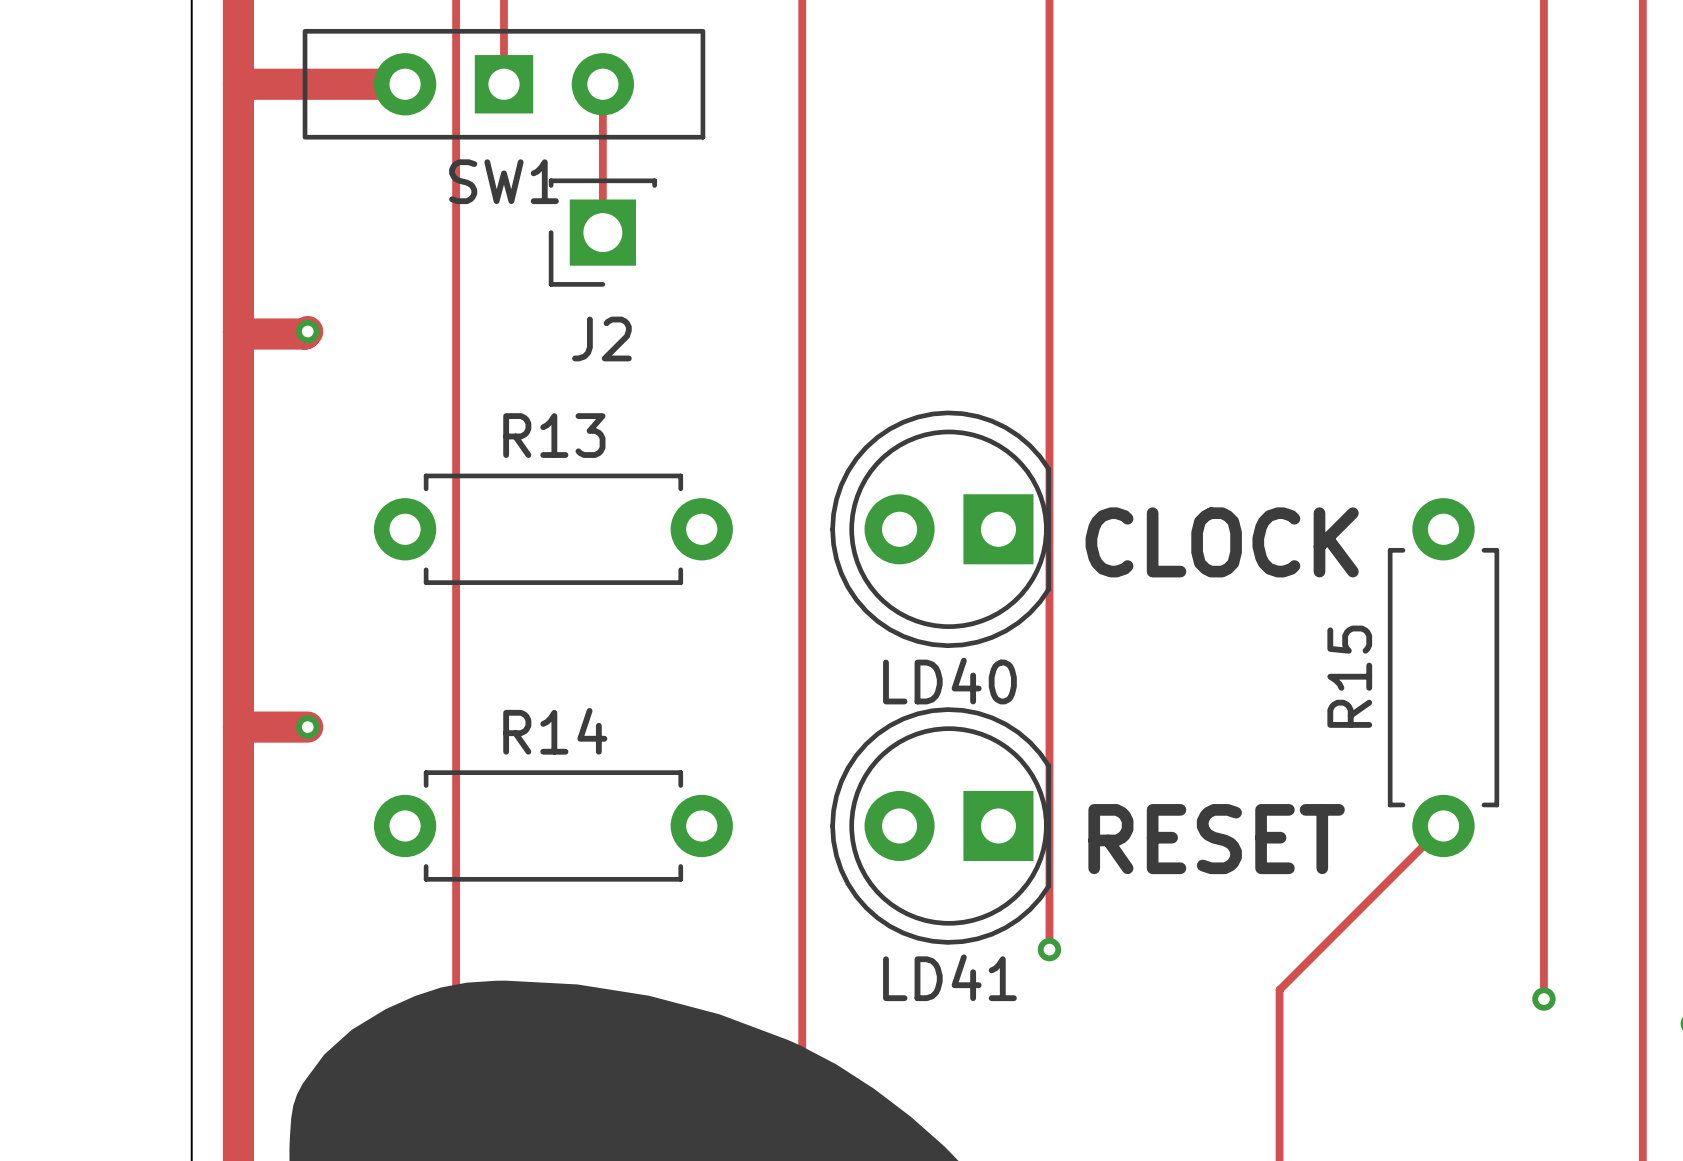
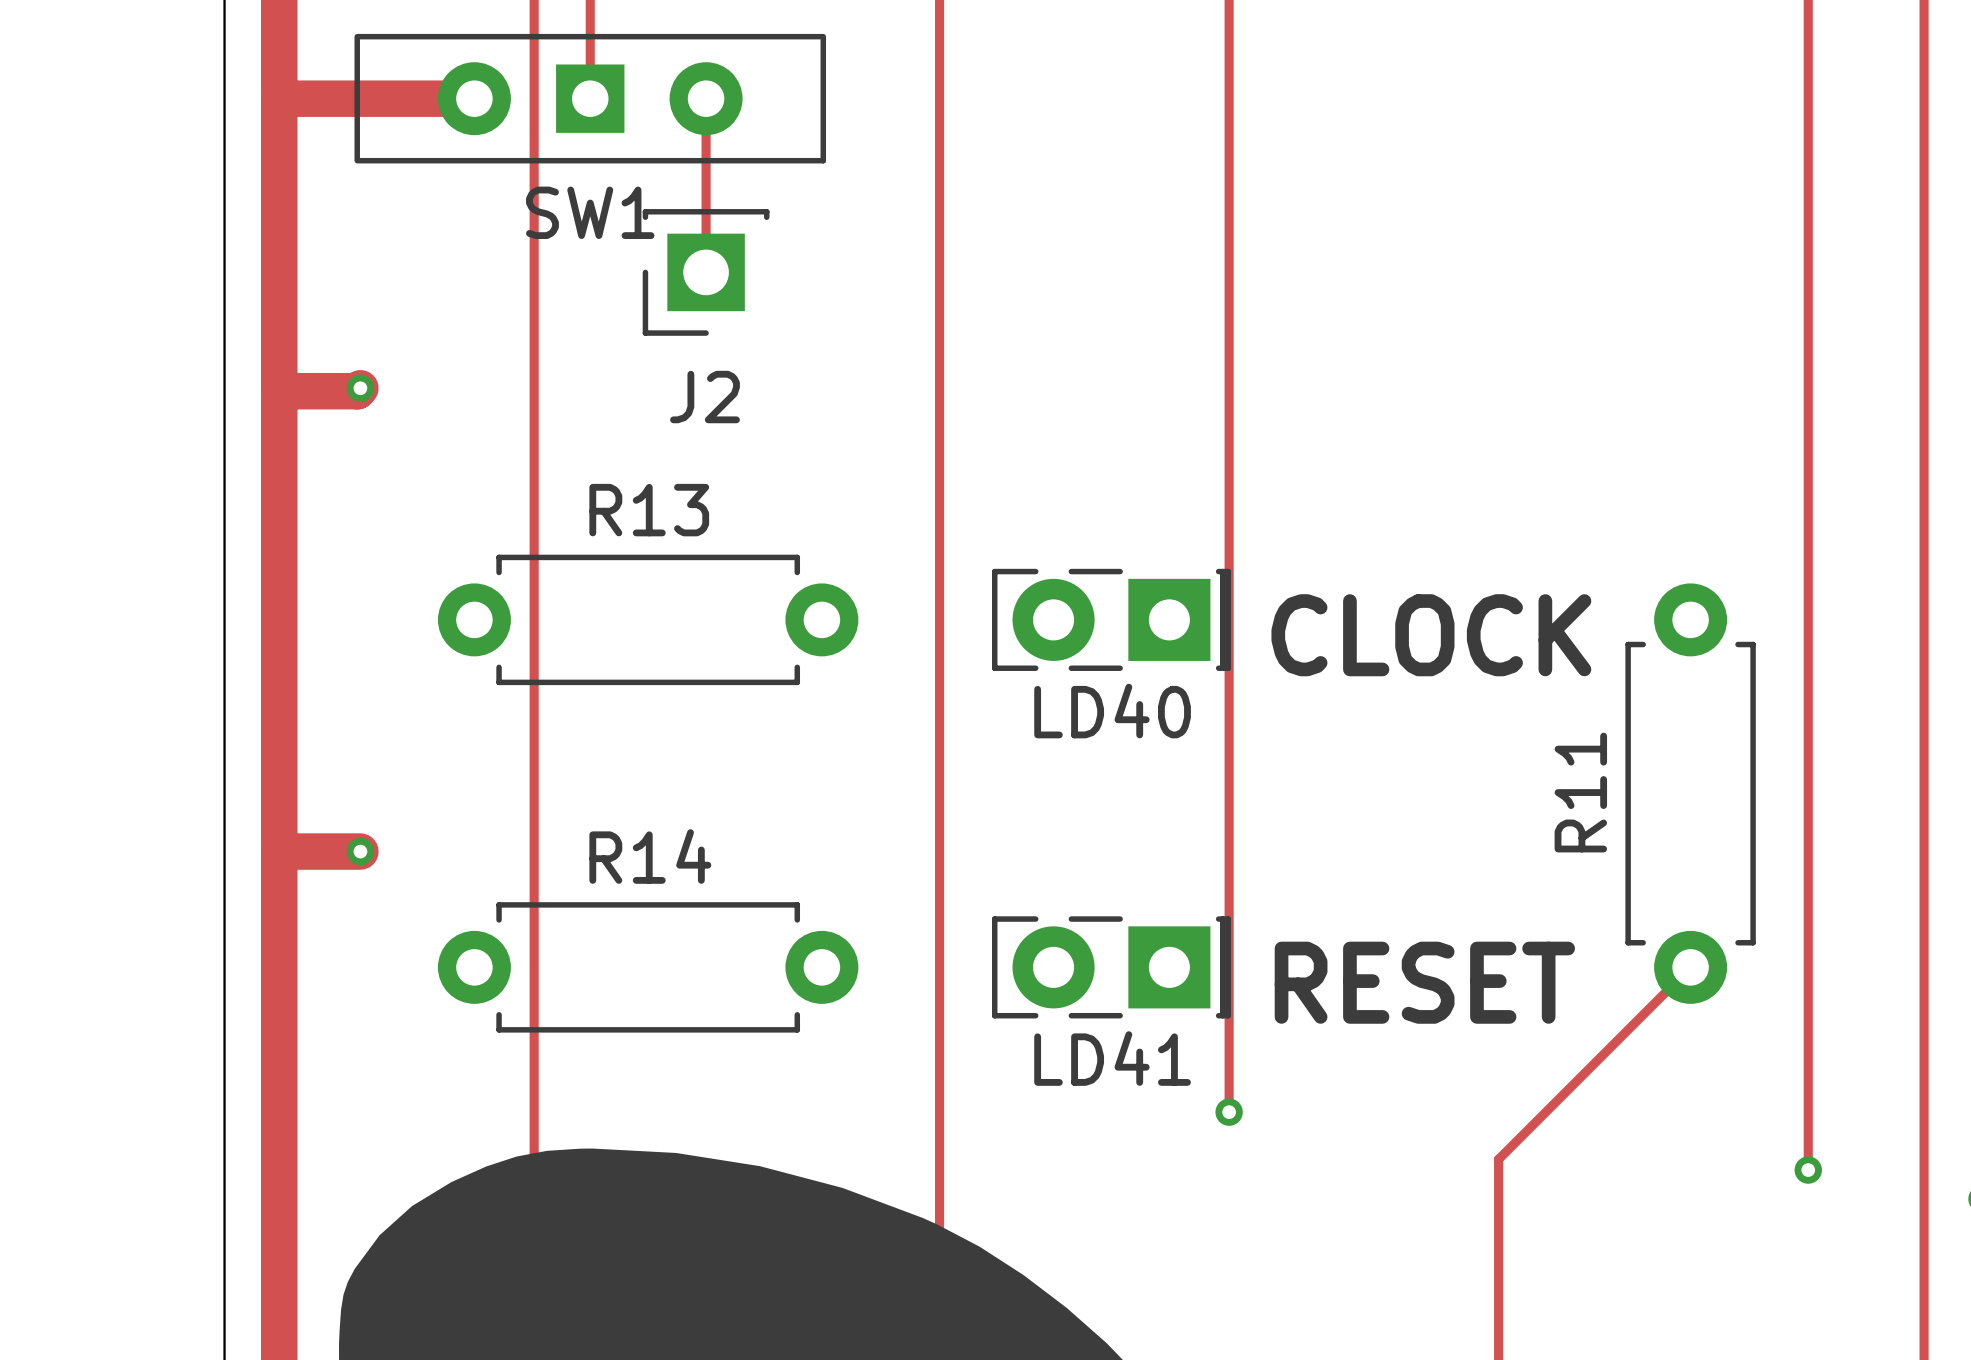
LD40 footprint: [830, 410, 1052, 649] -> [992, 568, 1231, 671]
R15 name: R15 (1349, 676) -> R11 (1580, 792)
LD41 footprint: [830, 707, 1052, 945] -> [992, 916, 1231, 1019]

